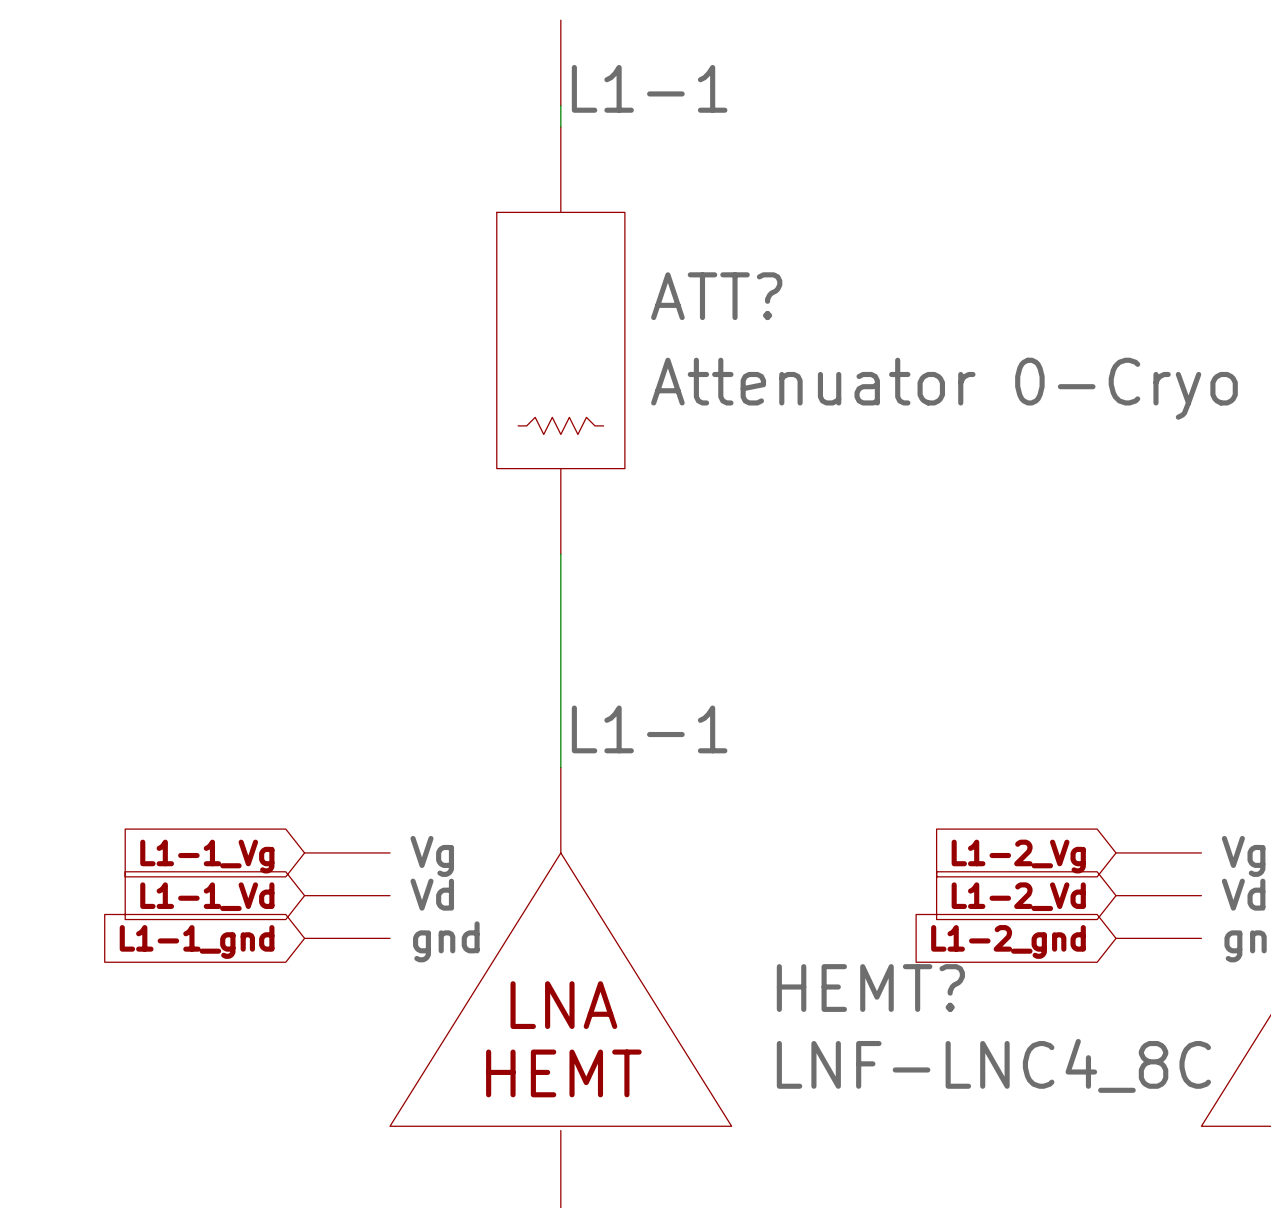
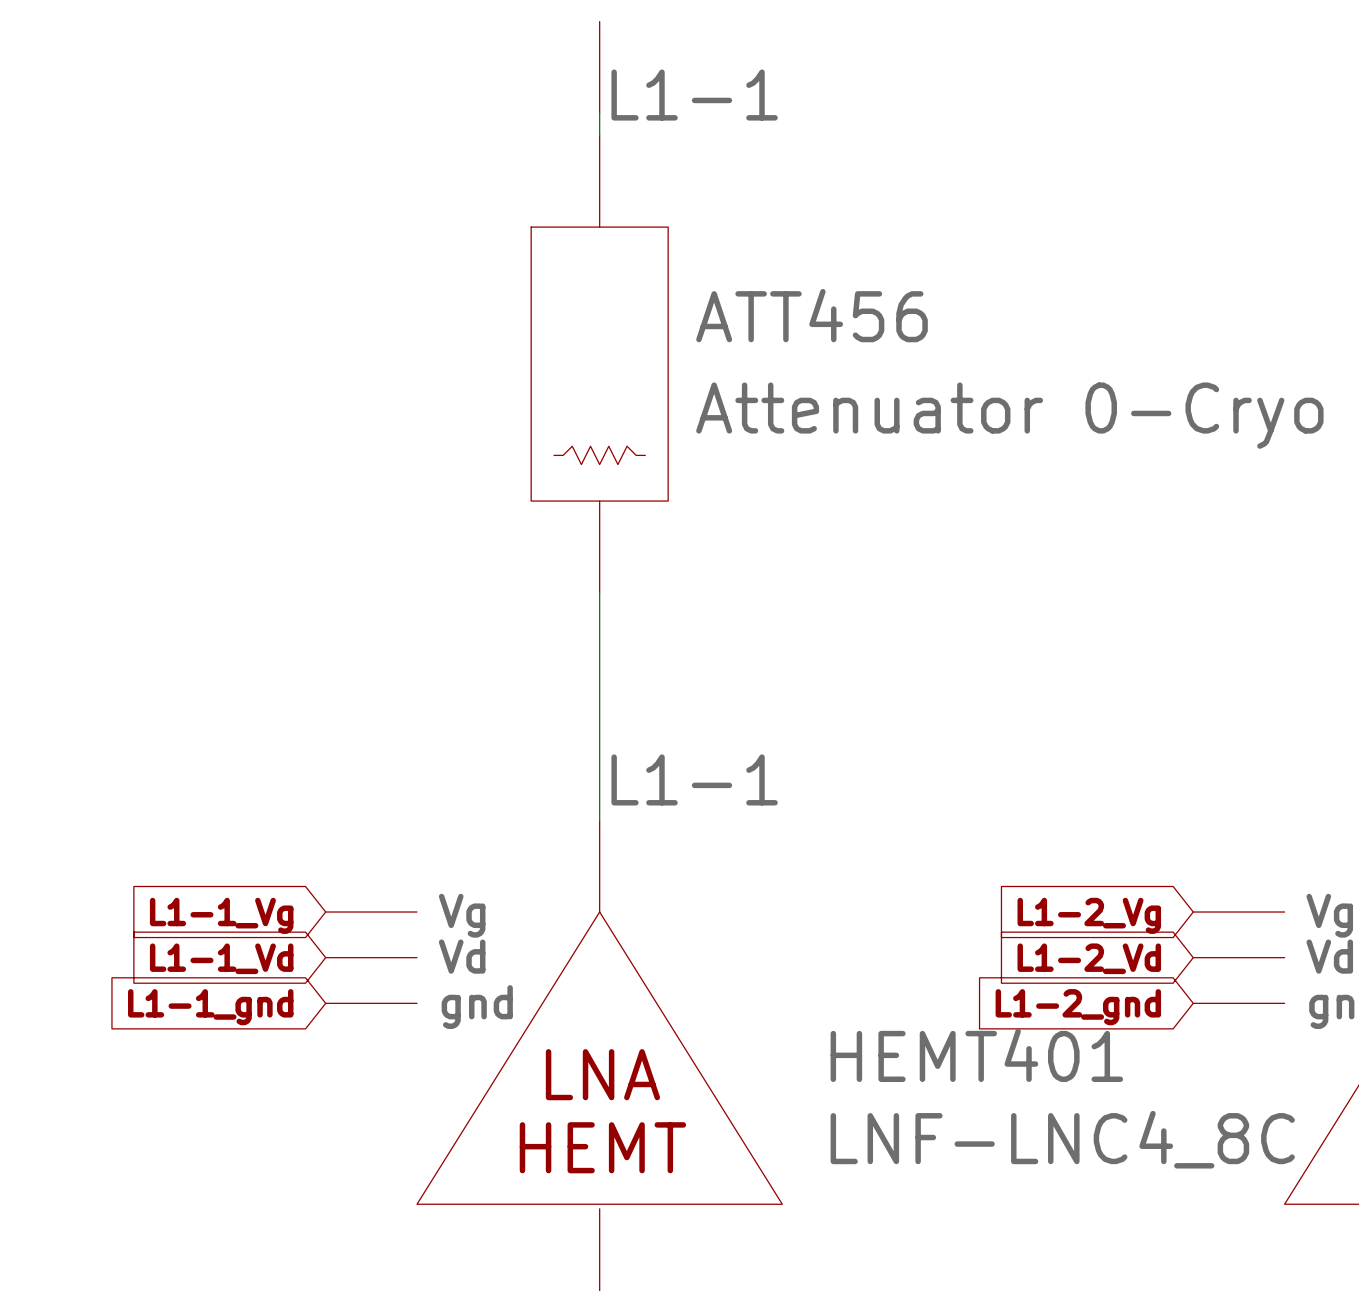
ATT? name: ATT? (716, 296) -> ATT456 (812, 315)
HEMT? name: HEMT? (870, 988) -> HEMT401 (976, 1055)

